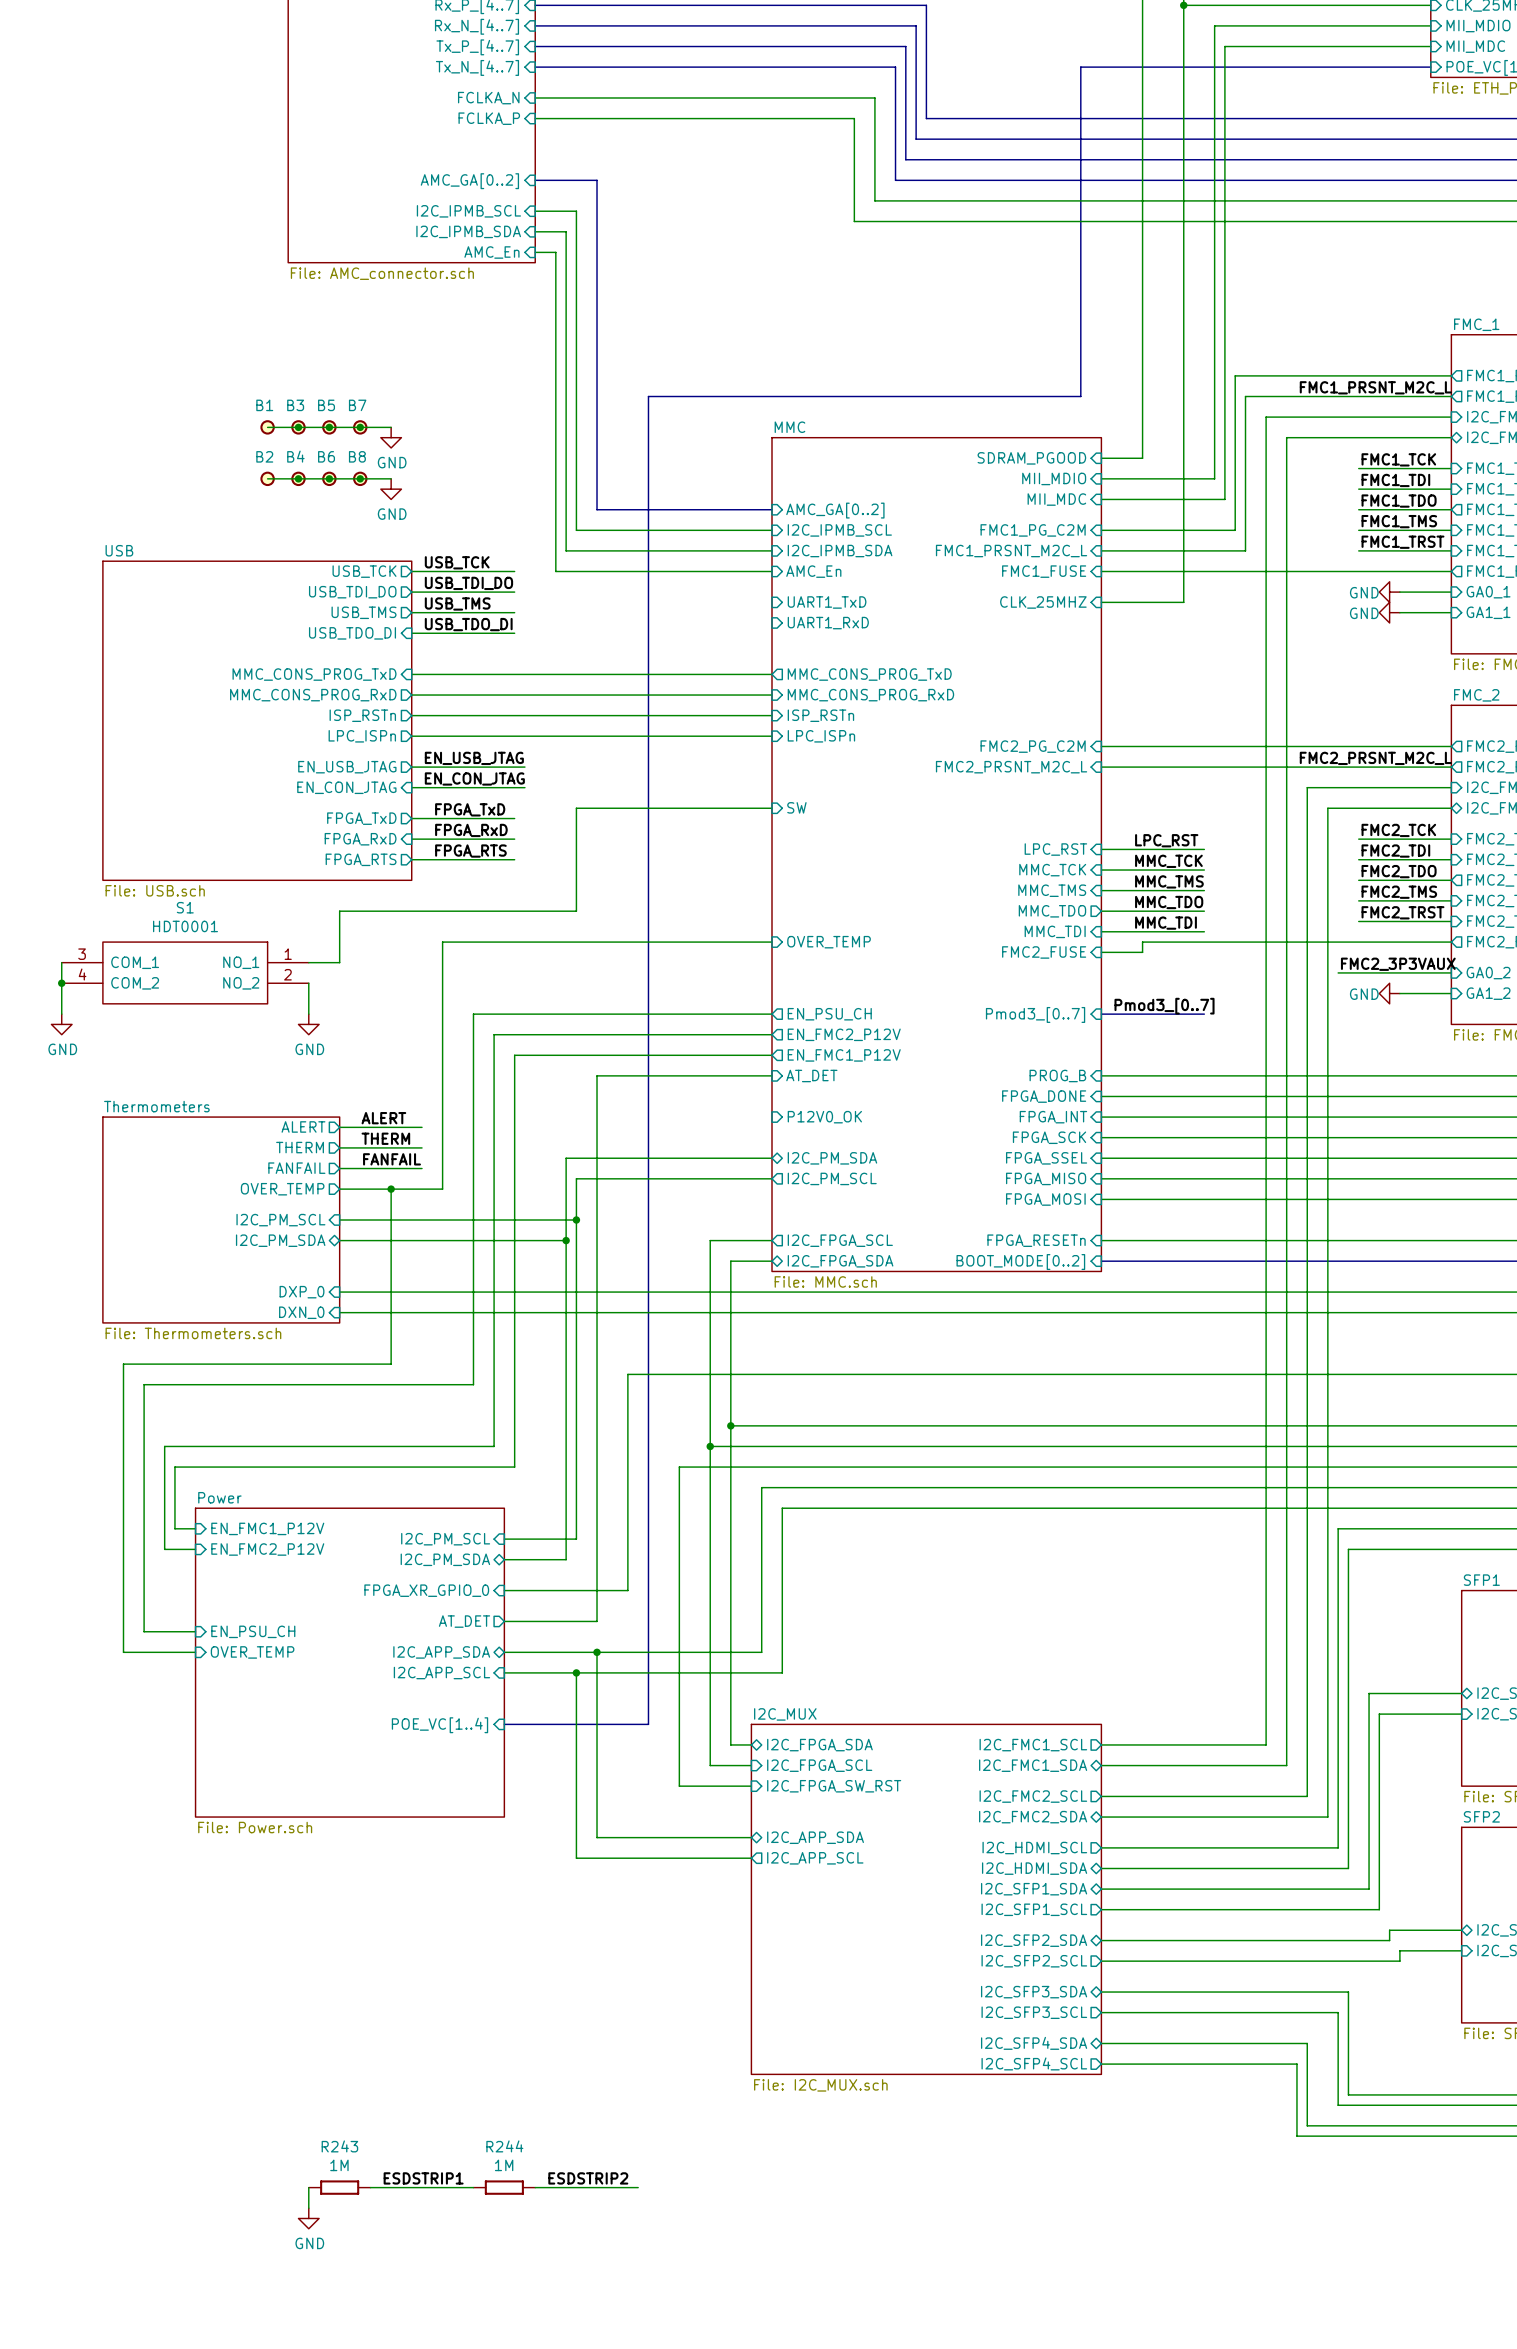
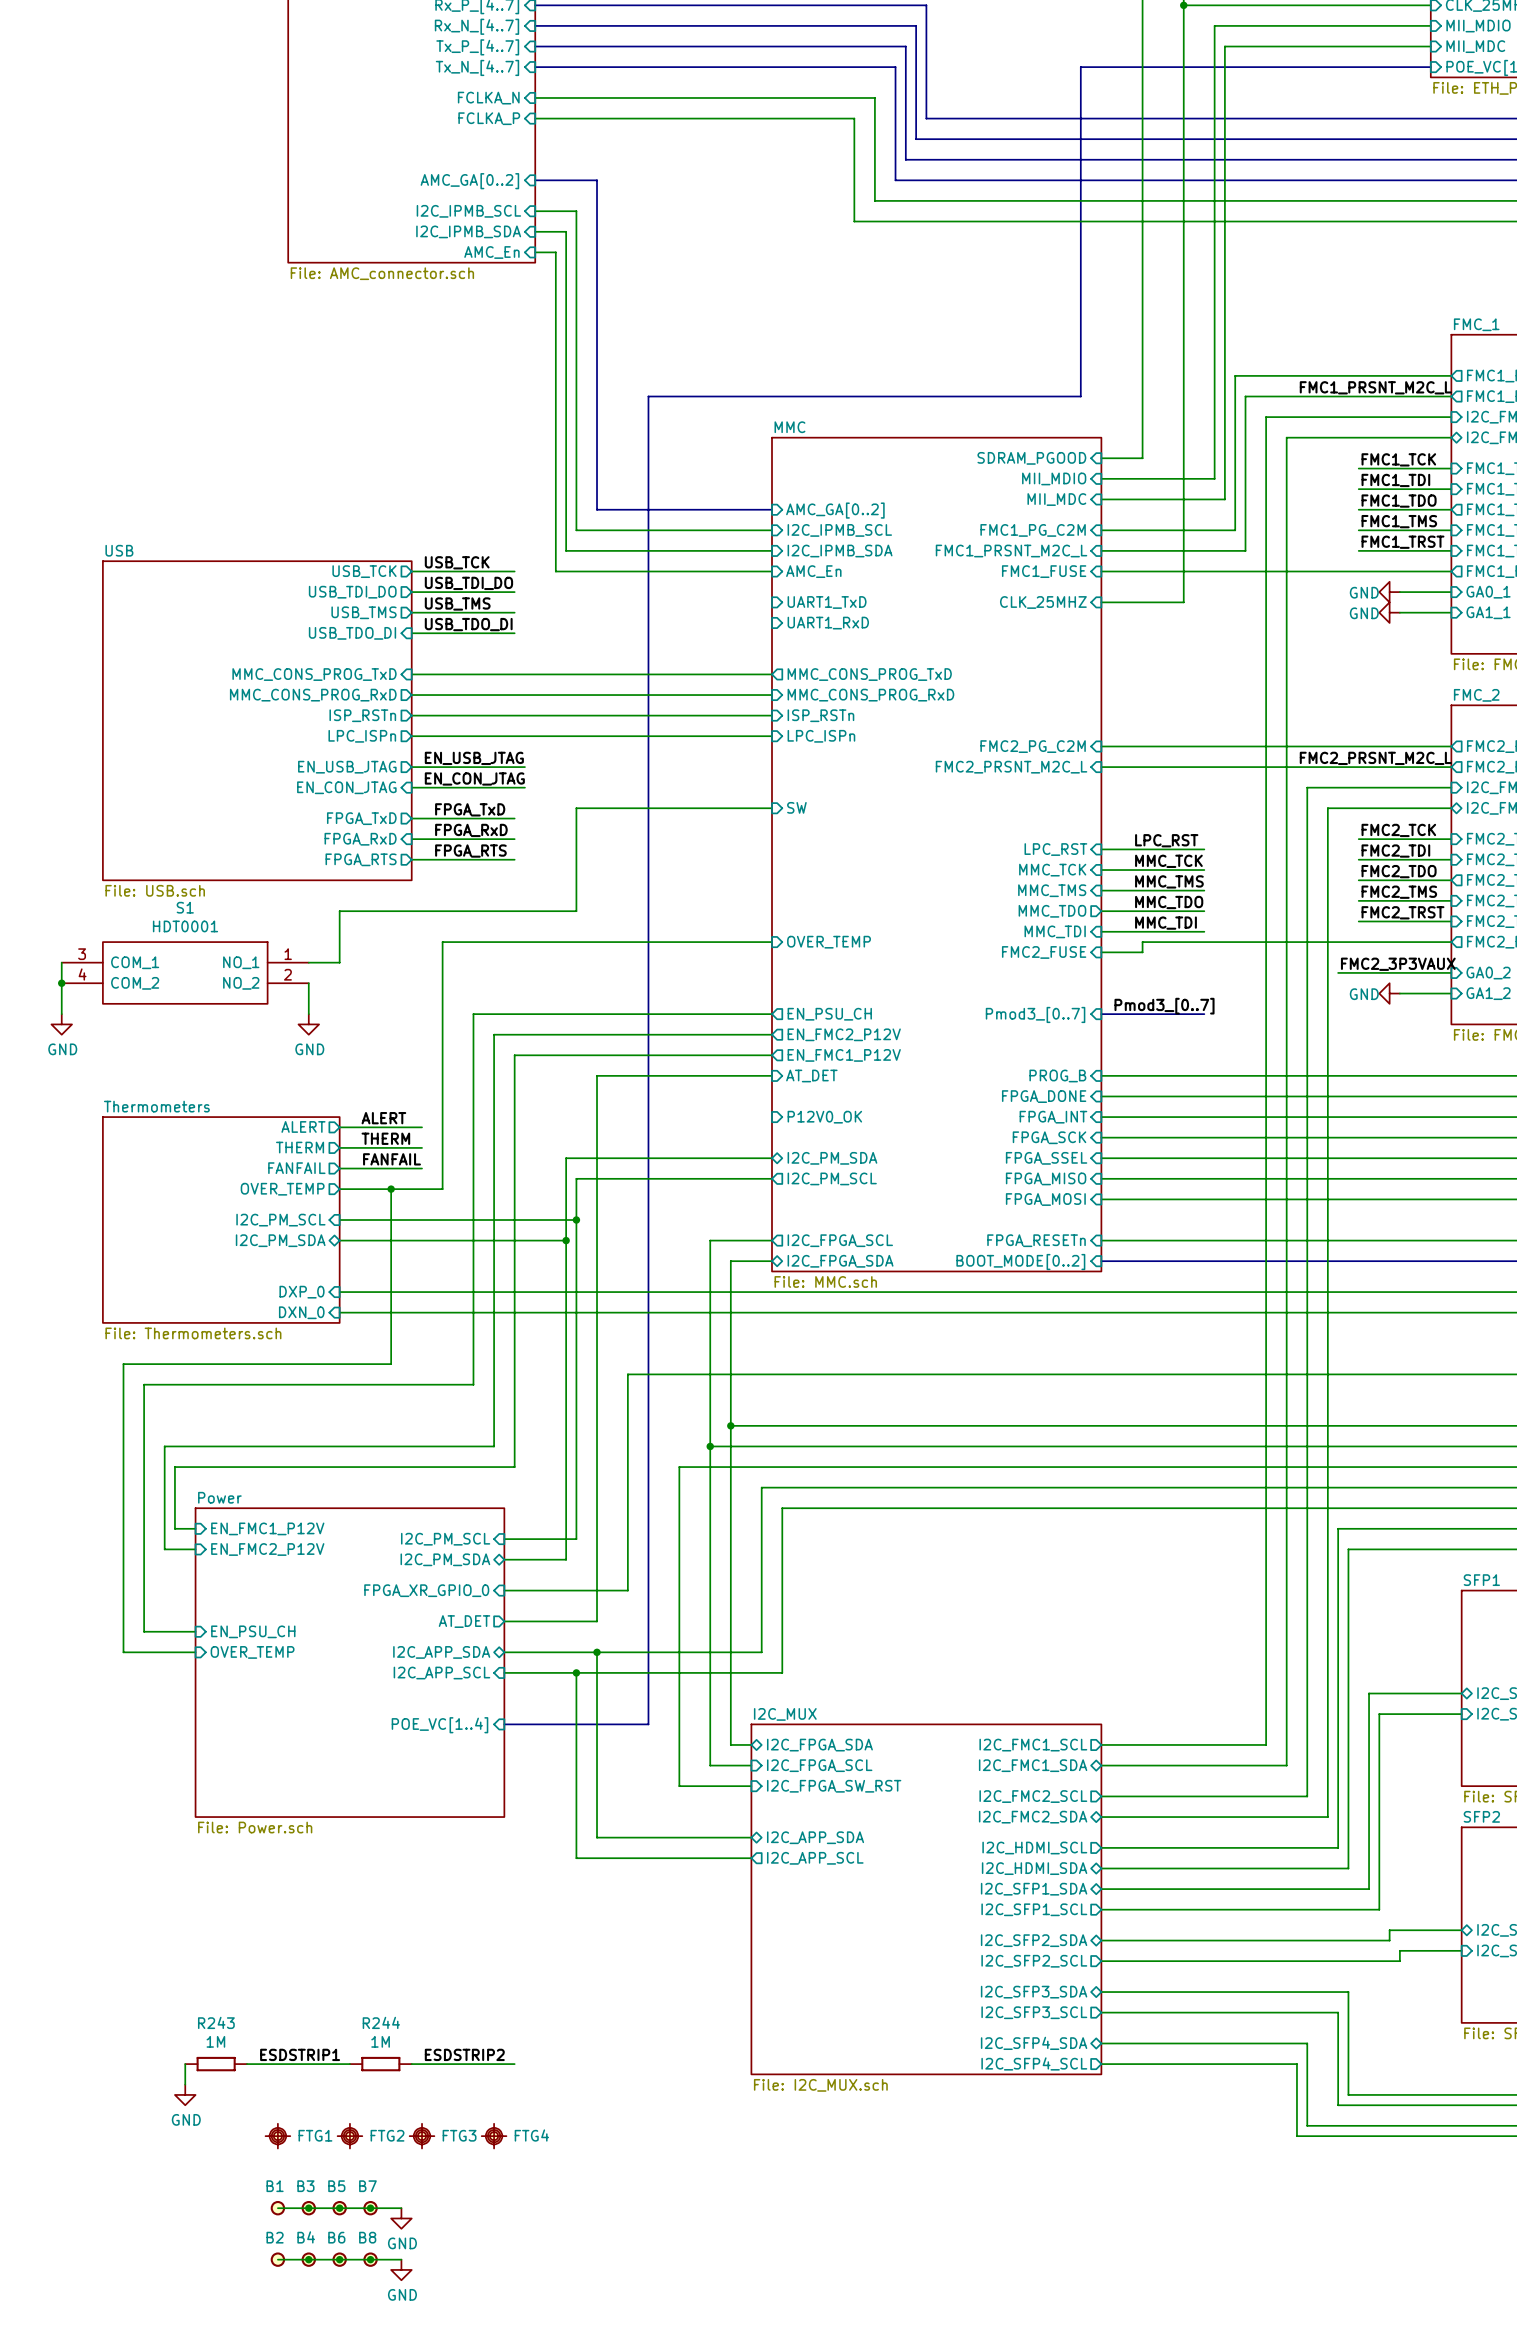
wire: (267, 427) (391, 427) -> none
B1 position: (267, 427) -> (277, 2208)
B3 position: (298, 427) -> (308, 2208)
junction: (298, 427) -> none
B5 position: (329, 427) -> (339, 2208)
junction: (329, 427) -> none
B7 position: (360, 427) -> (370, 2208)
junction: (360, 427) -> none
power symbol: GND (391, 437) -> none
wire: (267, 478) (391, 478) -> none
B2 position: (267, 478) -> (277, 2259)
B4 position: (298, 478) -> (308, 2259)
junction: (298, 478) -> none
B6 position: (329, 478) -> (339, 2259)
junction: (329, 478) -> none
B8 position: (360, 478) -> (370, 2259)
junction: (360, 478) -> none
power symbol: GND (391, 489) -> none
power symbol: none -> GND (185, 2094)
FTG1: none -> (277, 2136)
FTG2: none -> (349, 2136)
FTG3: none -> (422, 2136)
FTG4: none -> (494, 2136)
label position: ESDSTRIP1 (423, 2178) -> ESDSTRIP1 (300, 2054)
label position: ESDSTRIP2 (588, 2178) -> ESDSTRIP2 (464, 2054)
wire: (308, 2187) (308, 2208) -> (185, 2064) (185, 2084)
R243 position: (339, 2187) -> (216, 2064)
wire: (370, 2187) (473, 2187) -> (247, 2064) (349, 2064)
R244 position: (504, 2187) -> (380, 2064)
wire: (535, 2187) (638, 2187) -> (411, 2064) (514, 2064)
wire: none -> (277, 2208) (401, 2208)
junction: none -> (308, 2208)
junction: none -> (339, 2208)
junction: none -> (370, 2208)
power symbol: GND (308, 2218) -> none
power symbol: none -> GND (401, 2218)
wire: none -> (277, 2259) (401, 2259)
junction: none -> (308, 2259)
junction: none -> (339, 2259)
junction: none -> (370, 2259)
power symbol: none -> GND (401, 2269)

